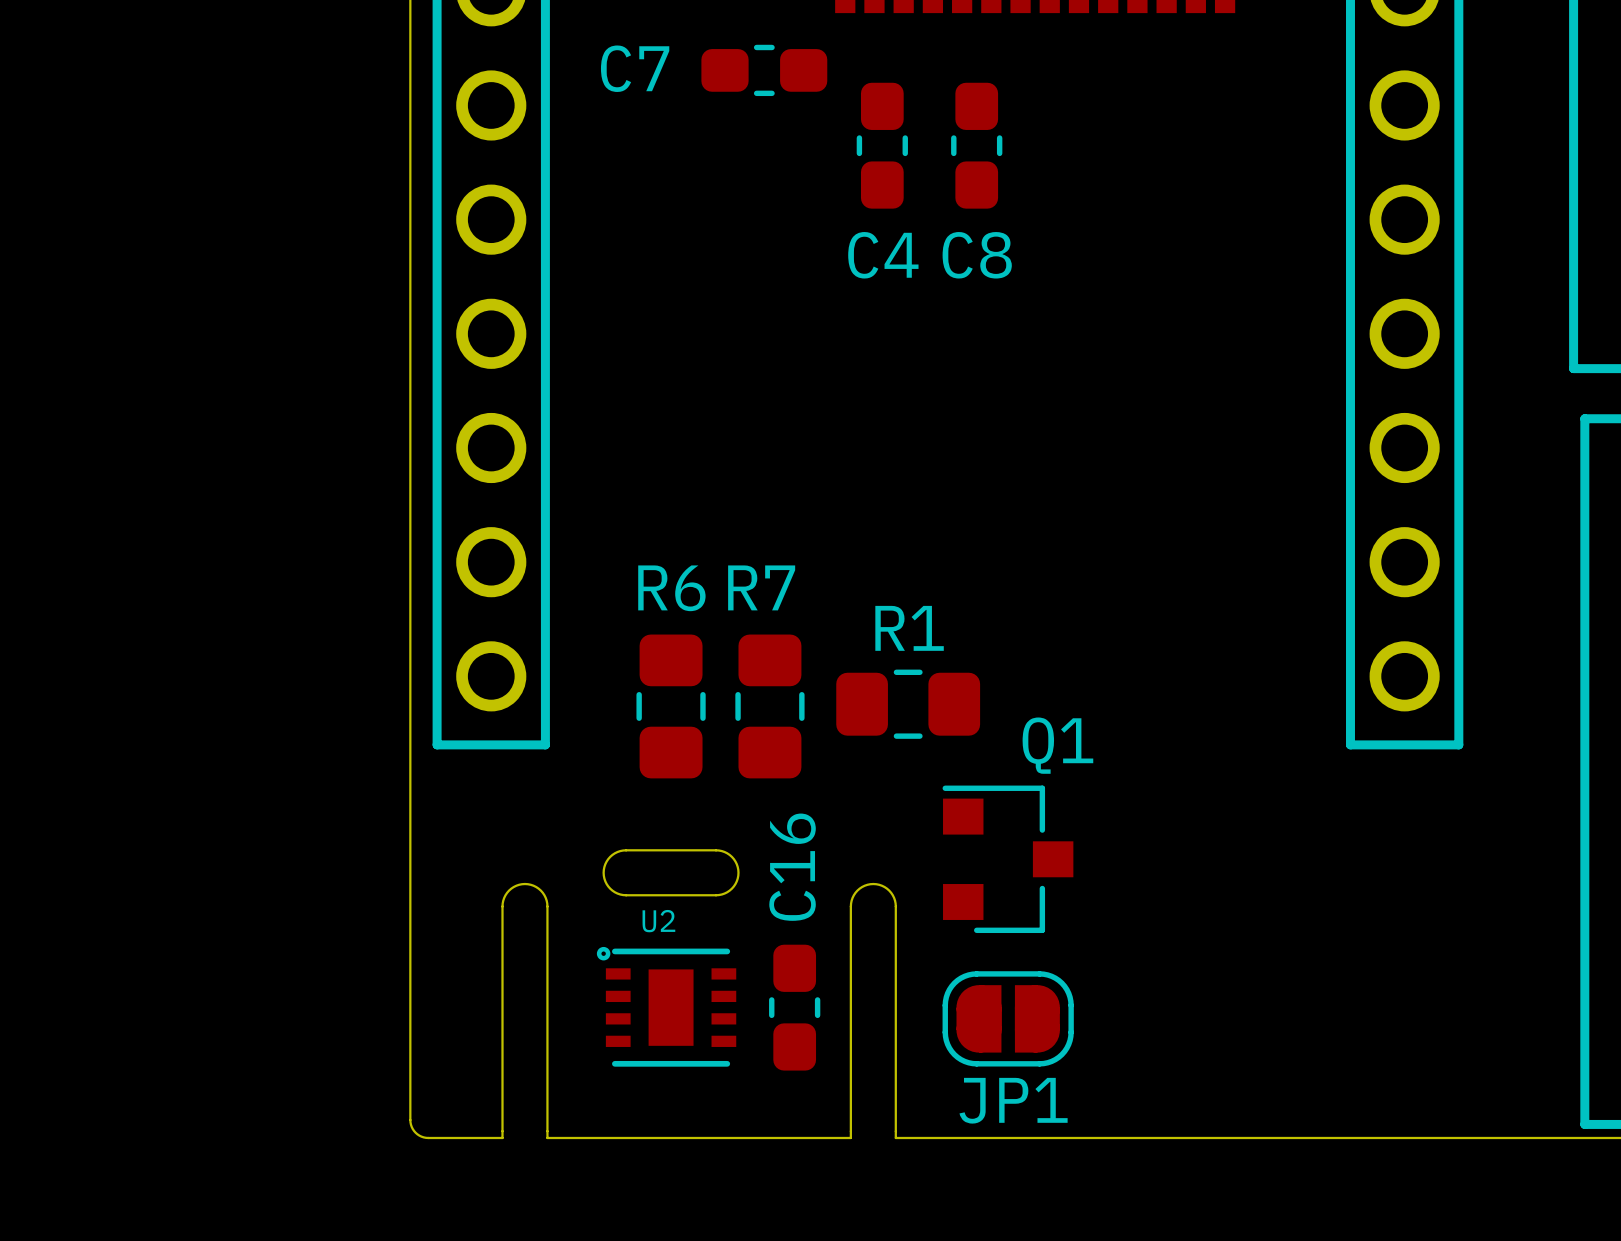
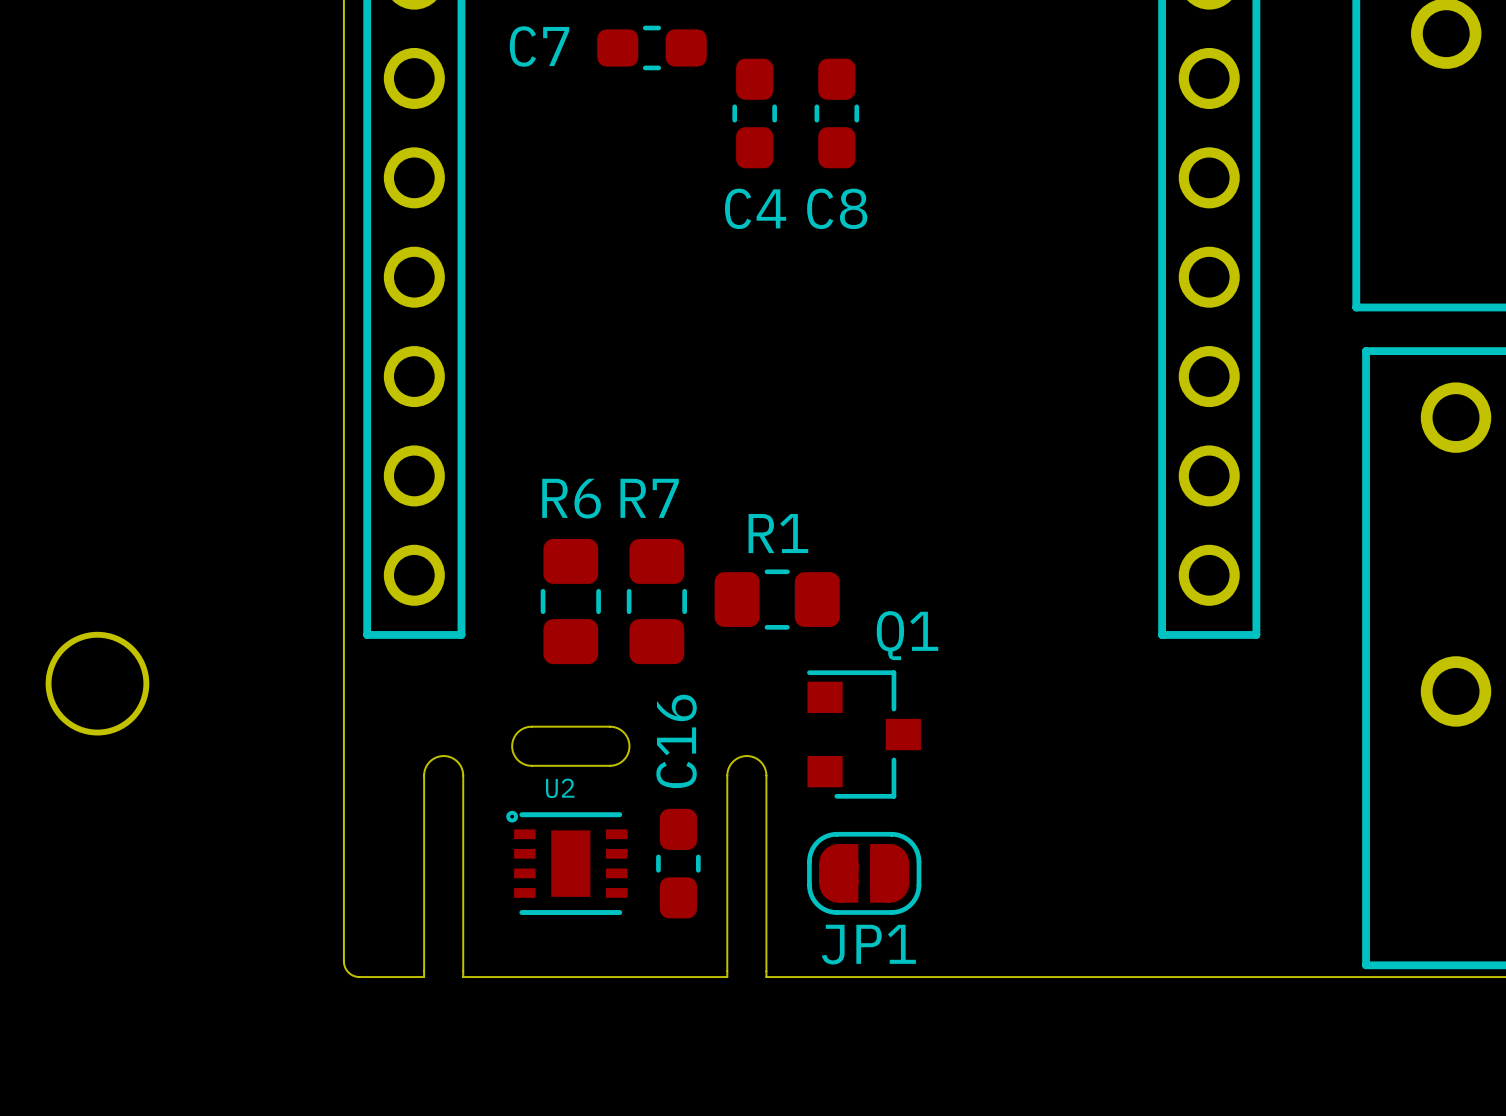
round board edge: none -> [45, 631, 150, 736]

